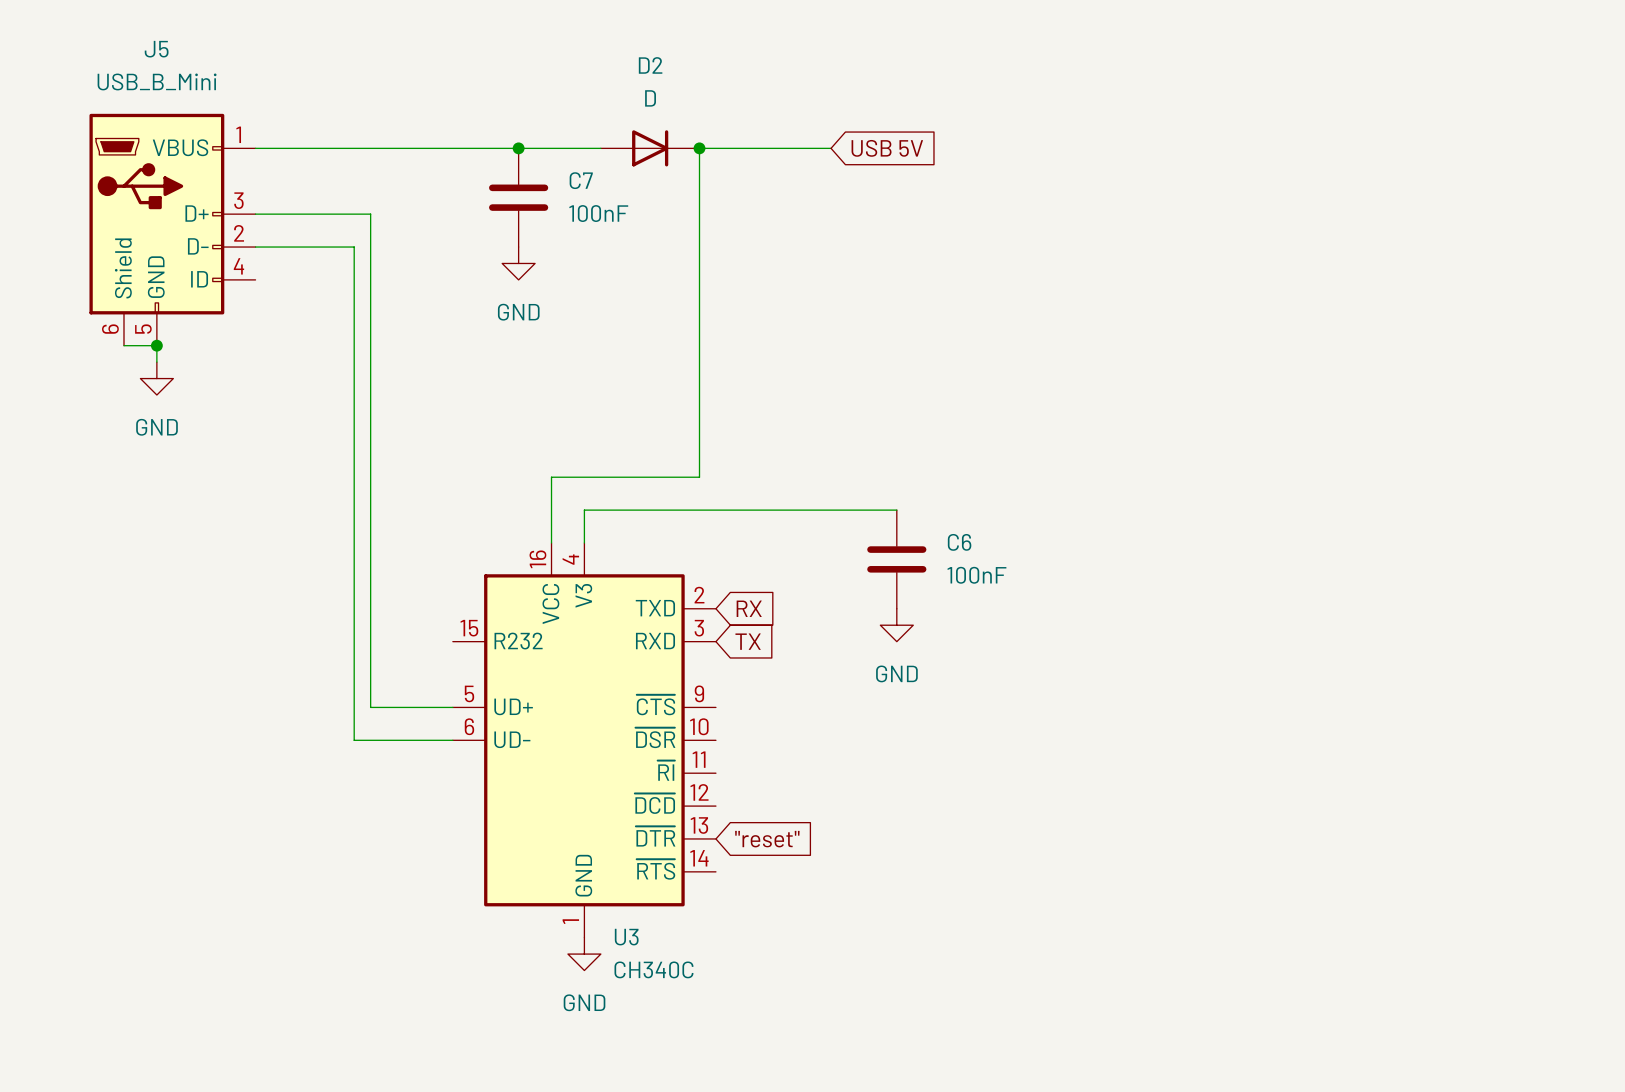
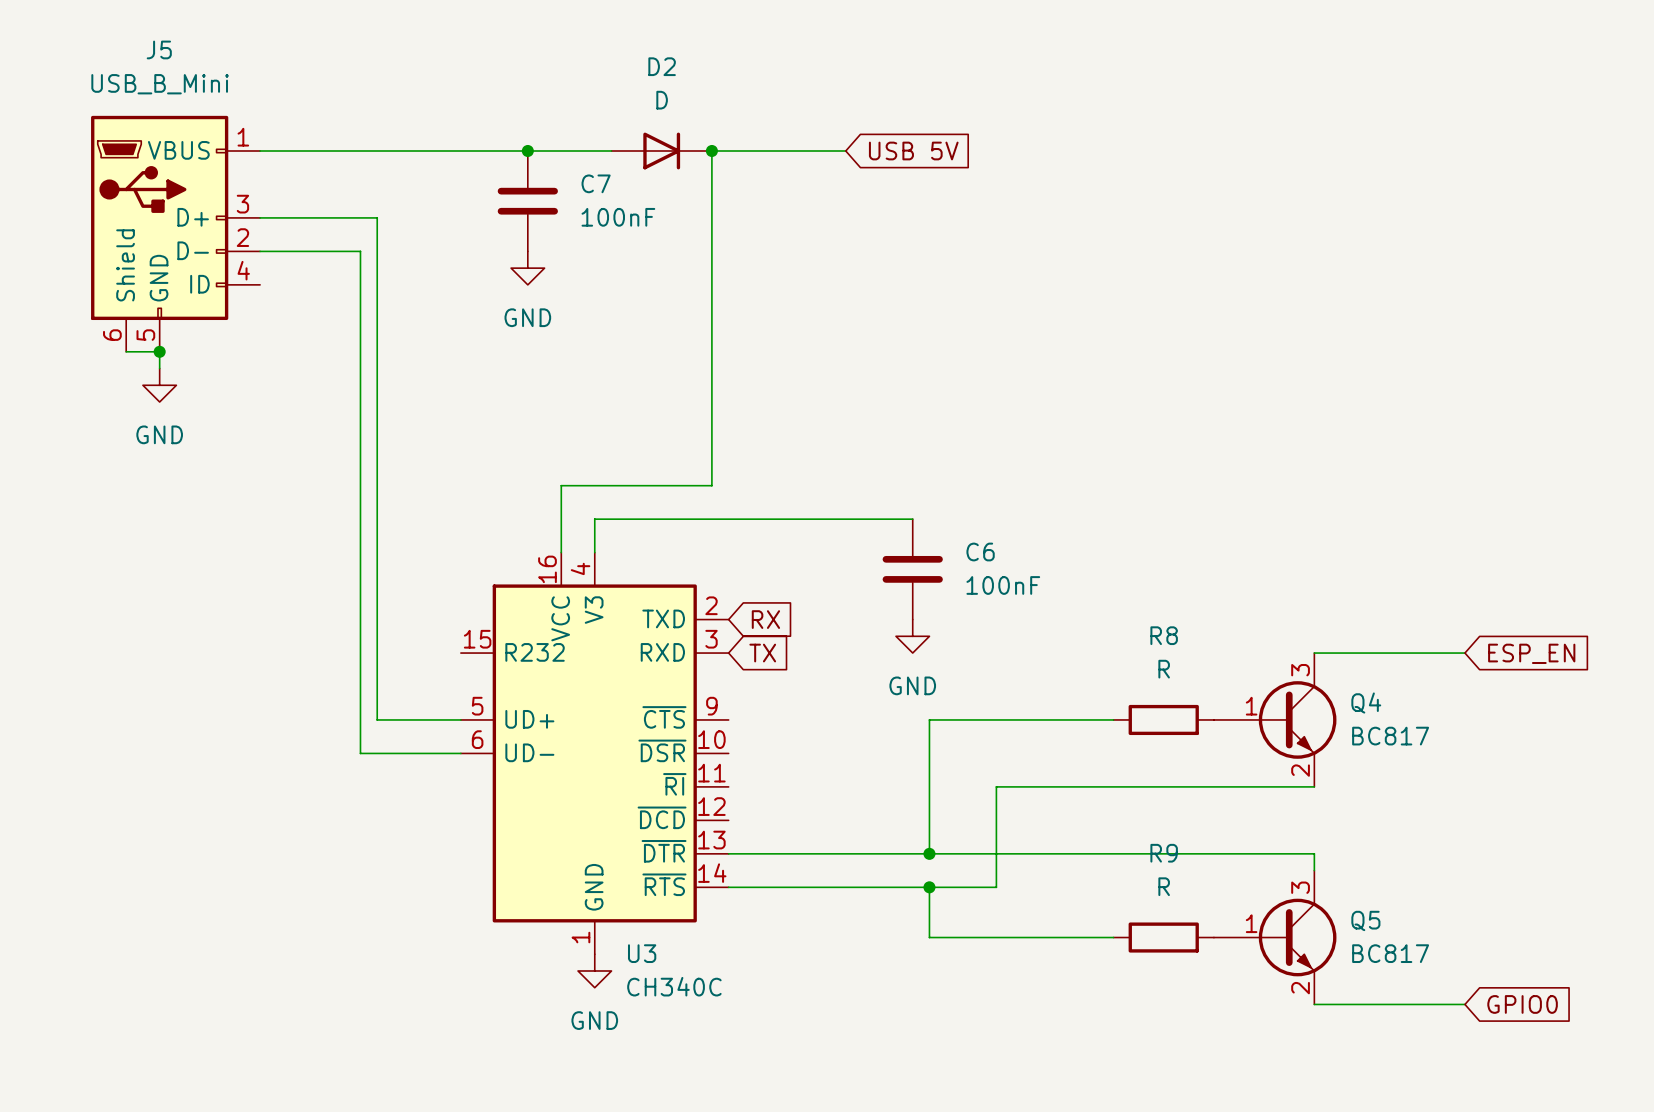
wire: none -> (1314, 653) (1464, 653)
global label: none -> ESP_EN (1531, 653)
wire: none -> (1113, 719) (929, 719) (929, 853)
R8: none -> R (1163, 719)
Q4: none -> BC817 (1275, 719)
wire: none -> (1314, 786) (996, 786) (996, 887) (728, 887)
wire: none -> (728, 853) (1314, 853) (1314, 870)
junction: none -> (929, 853)
global label: "reset" (767, 839) -> none
wire: none -> (929, 887) (929, 937) (1113, 937)
junction: none -> (929, 887)
R9: none -> R (1163, 937)
Q5: none -> BC817 (1275, 937)
wire: none -> (1314, 1004) (1464, 1004)
global label: none -> GPIO0 (1522, 1004)

